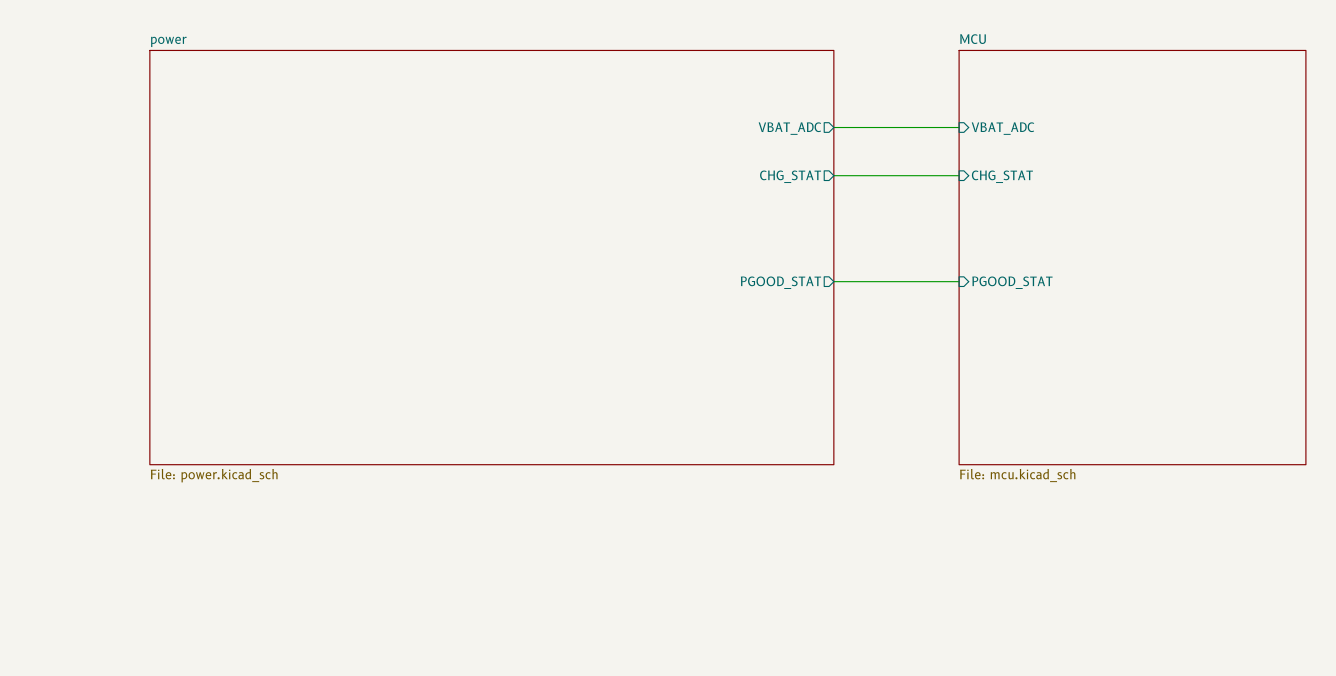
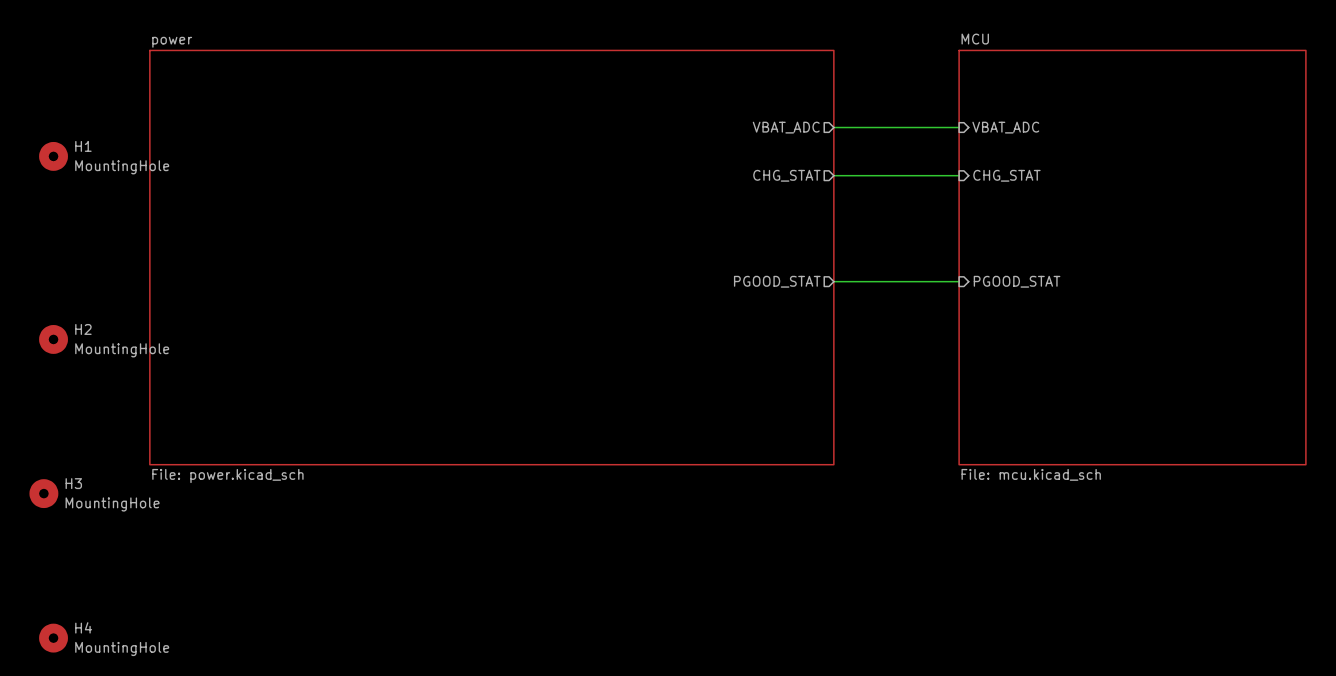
H1: none -> MountingHole (53, 156)
H2: none -> MountingHole (53, 339)
H3: none -> MountingHole (43, 493)
H4: none -> MountingHole (53, 638)

